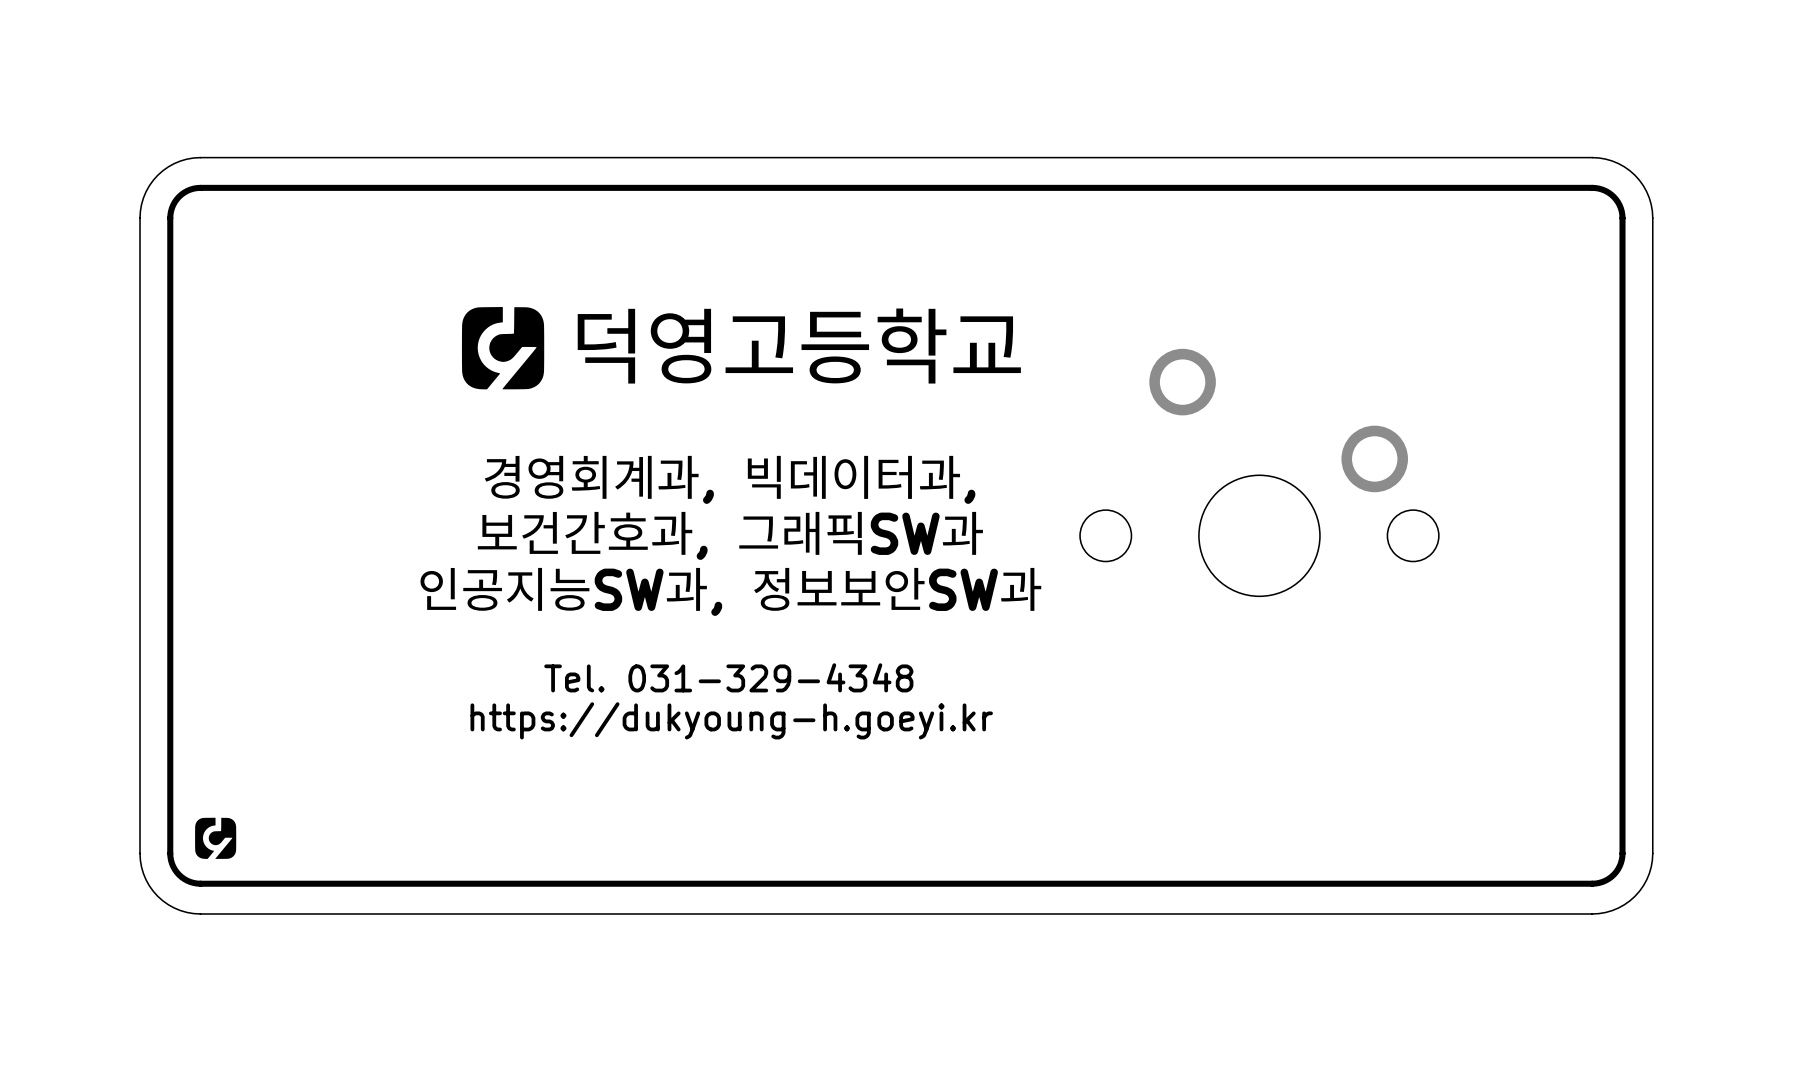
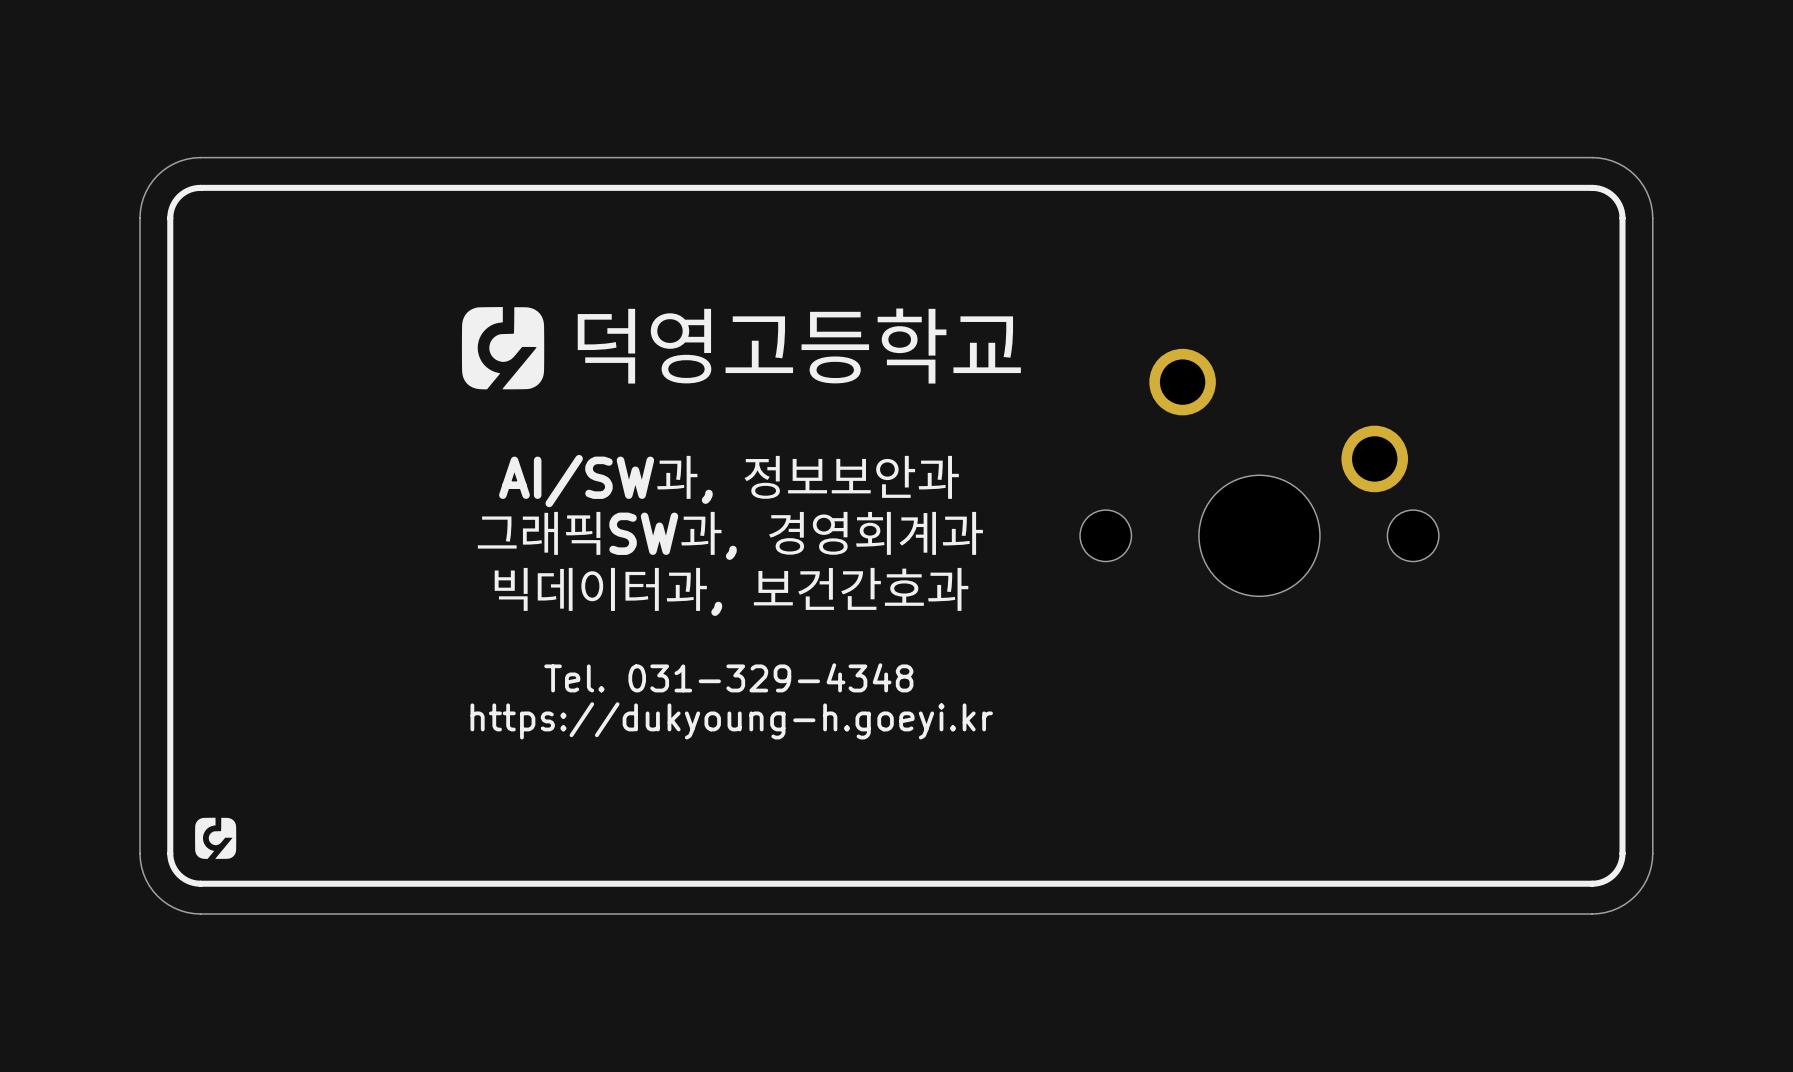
text: 경영회계과, 빅데이터과, (728, 478) -> AI/SW과, 정보보안과 (730, 479)
text: 보건간호과, 그래픽SW과 (730, 534) -> 그래픽SW과, 경영회계과 (730, 534)
text: 인공지능SW과, 정보보안SW과 (730, 590) -> 빅데이터과, 보건간호과 (731, 590)

